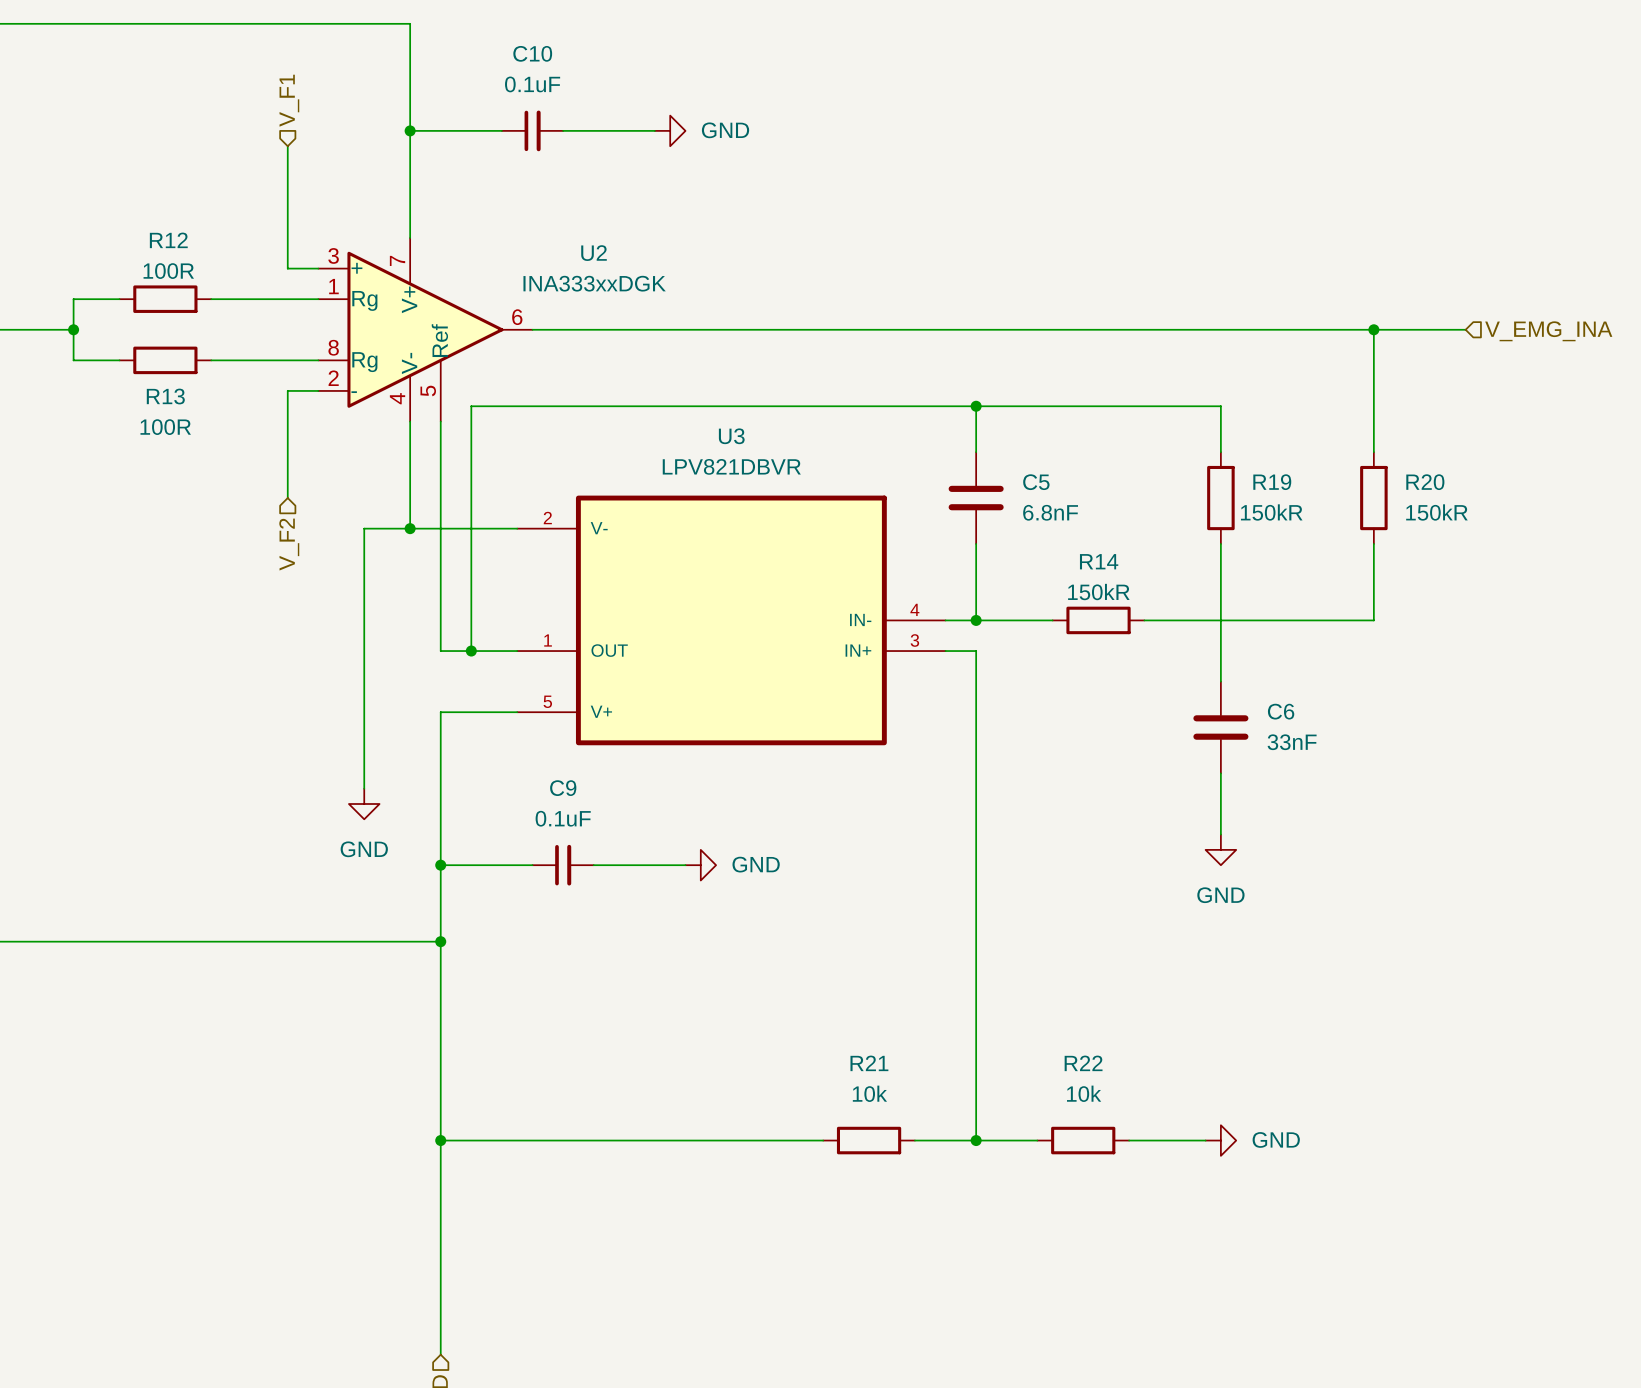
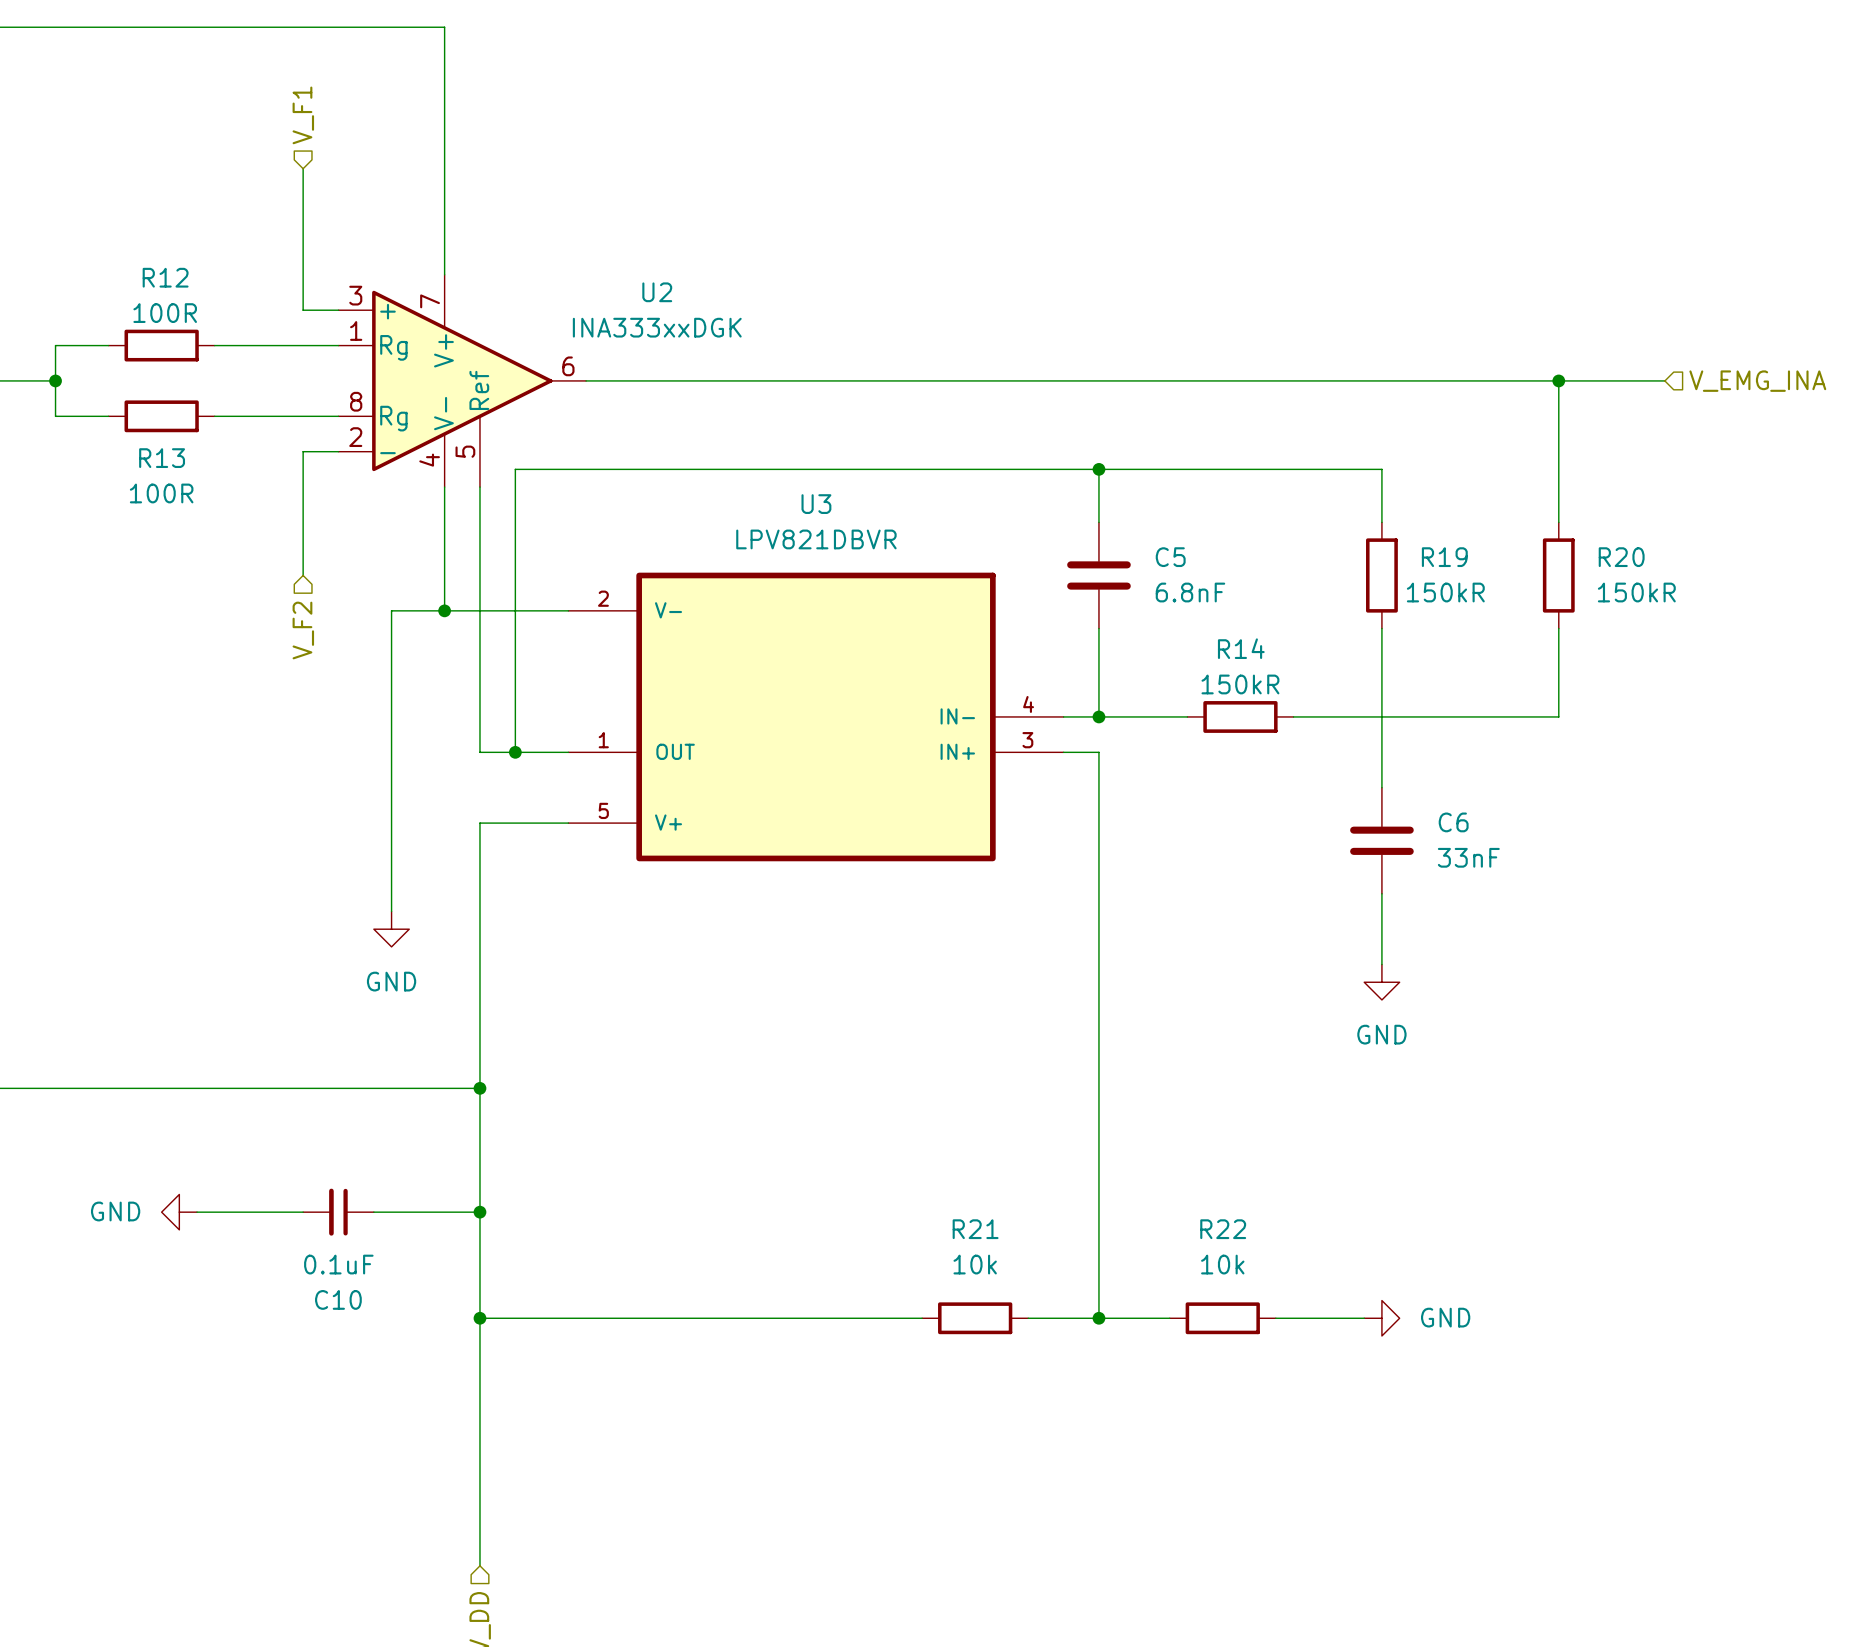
wire: (410, 130) (501, 130) -> none
junction: (410, 130) -> none
C10 rotation: 0° (532, 130) -> 180° (338, 1212)
C10 position: (532, 130) -> (338, 1212)
wire: (563, 130) (654, 130) -> none
power symbol: GND (670, 130) -> none
wire: (440, 865) (532, 865) -> (373, 1212) (479, 1212)
junction: (440, 865) -> none
C9: 0.1uF (563, 865) -> none
wire: (593, 865) (685, 865) -> none
power symbol: GND (700, 865) -> none
power symbol: none -> GND (179, 1212)
wire: none -> (197, 1212) (303, 1212)
junction: none -> (479, 1212)

